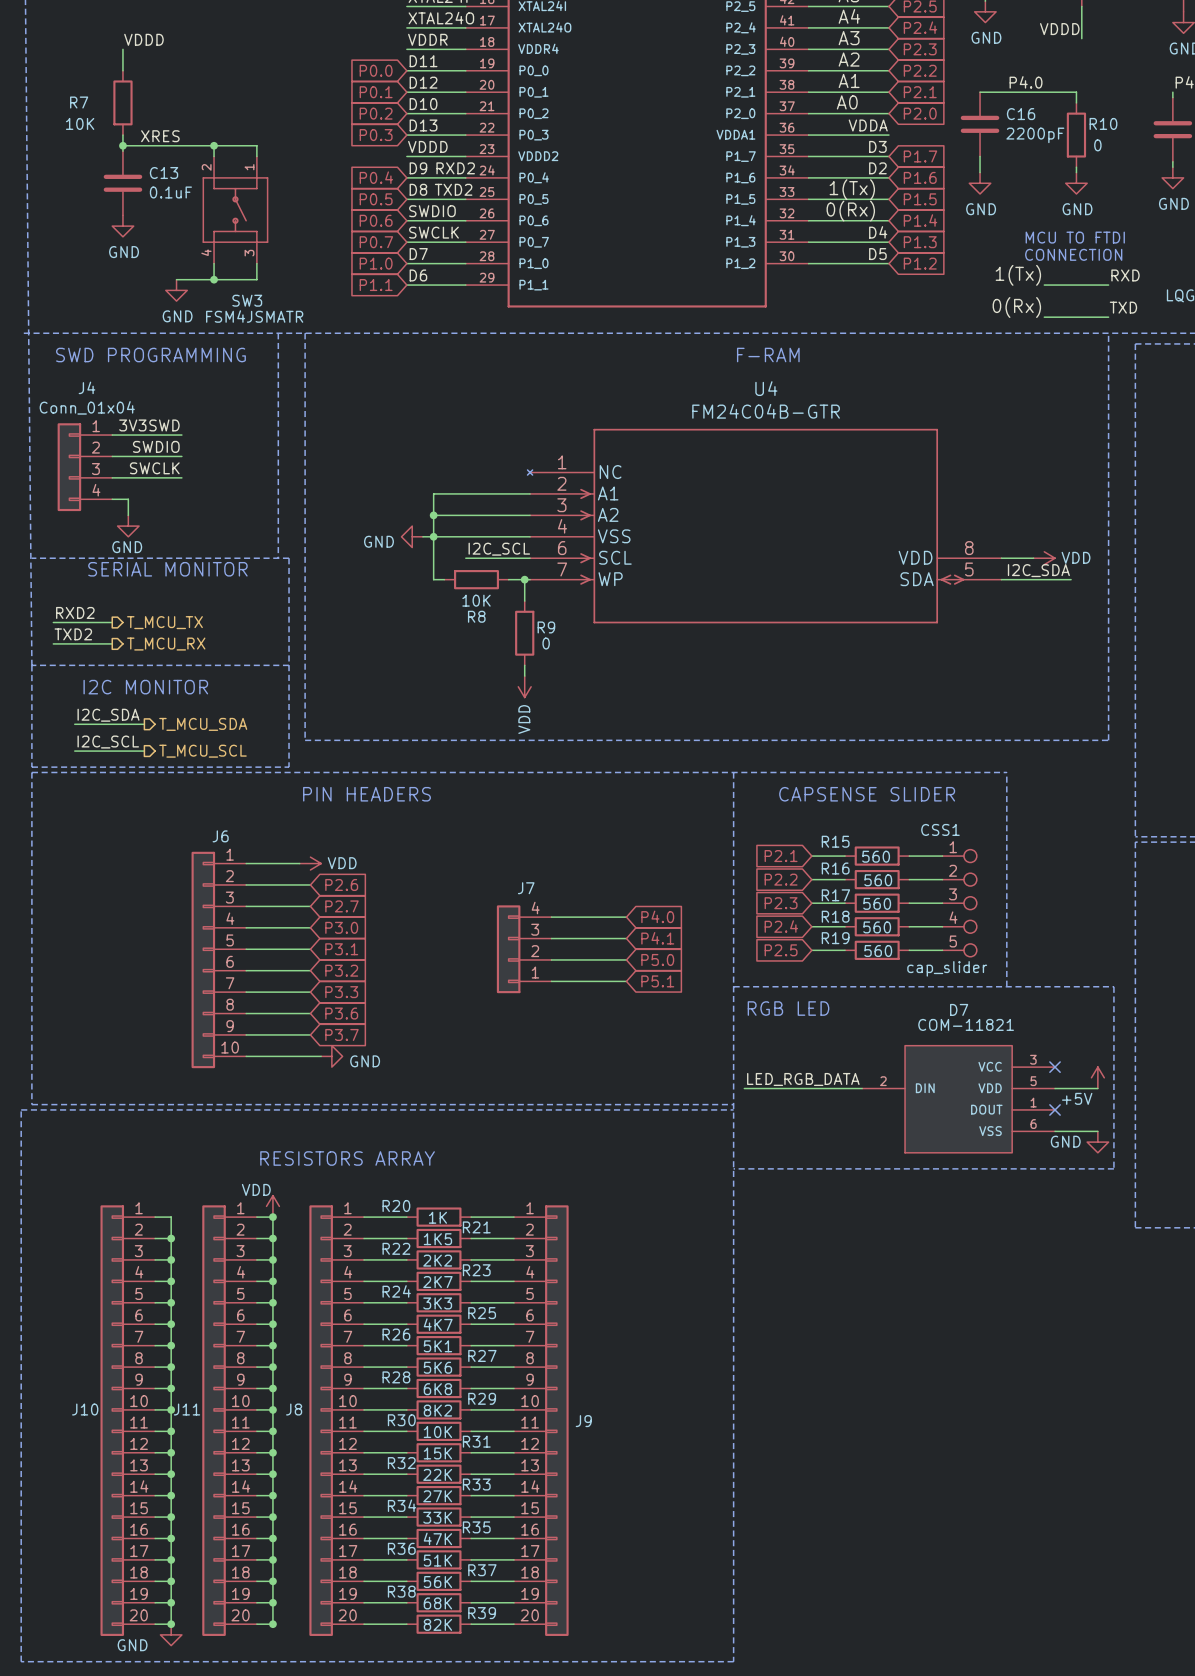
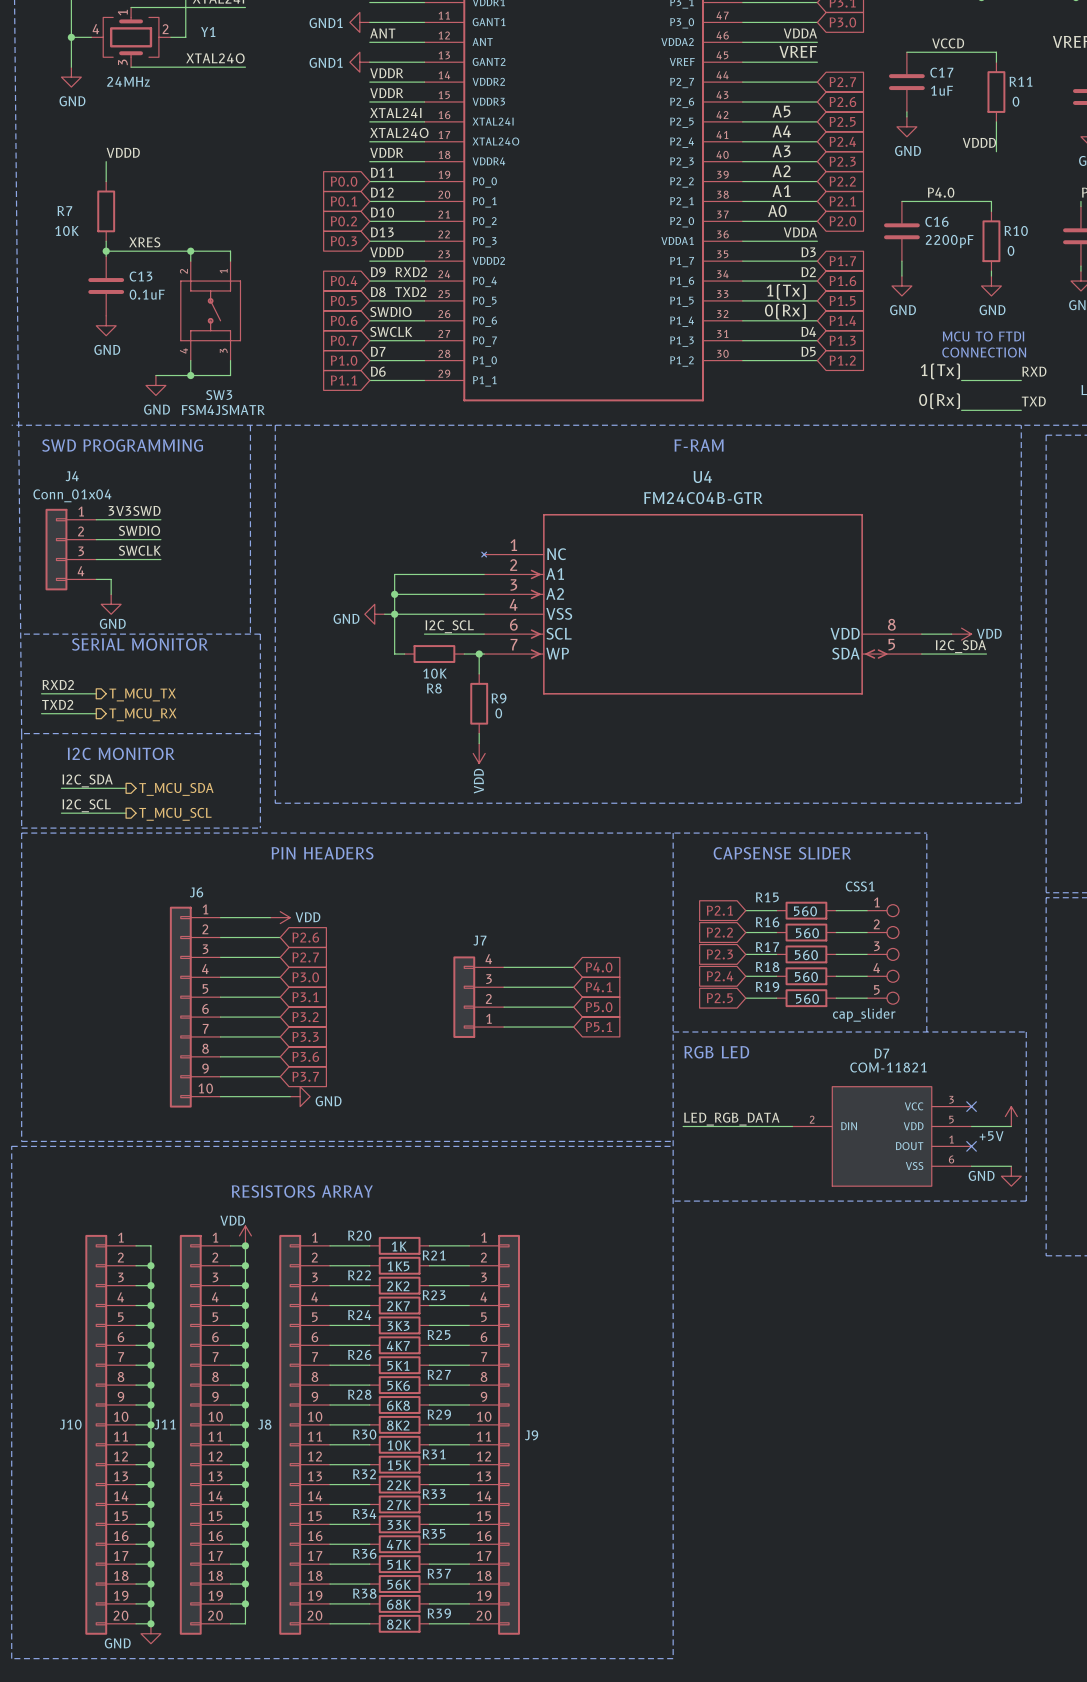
junction: (272, 1624) -> none

